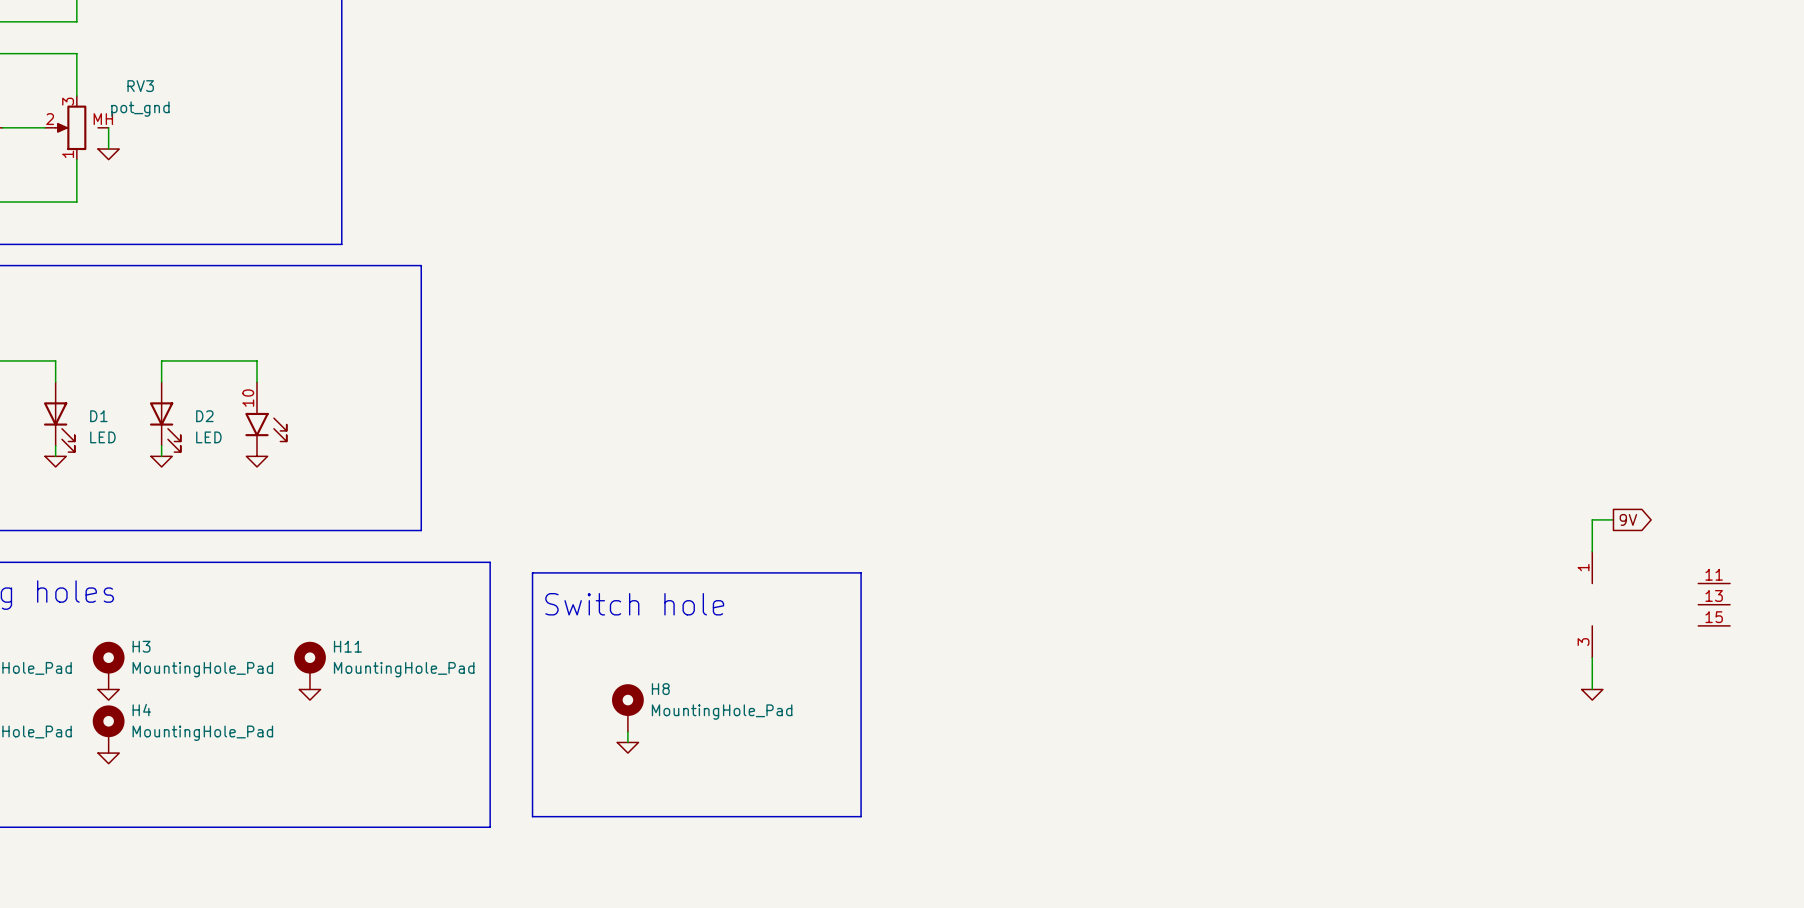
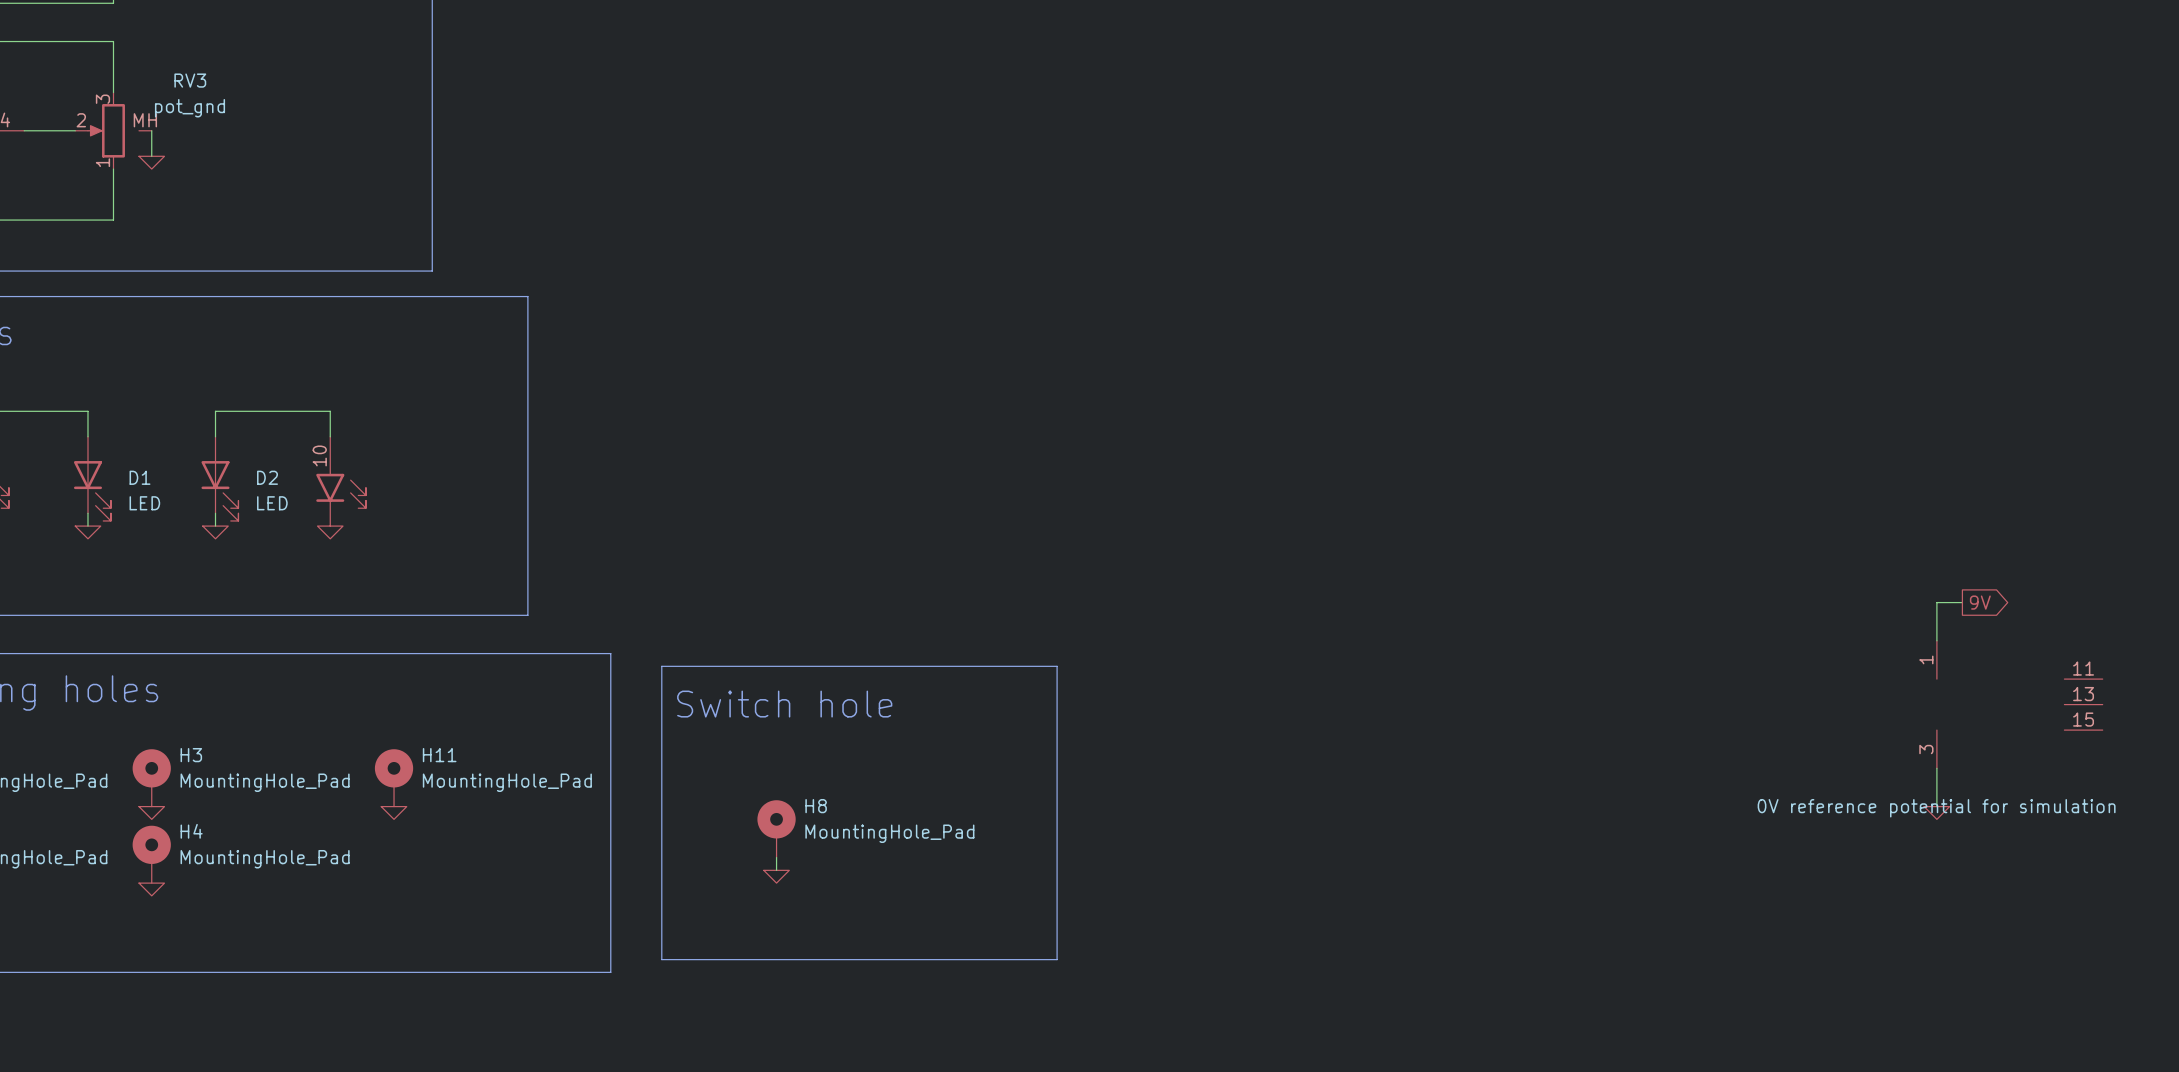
power symbol text: none -> 0V reference potential for simulation (1936, 808)

